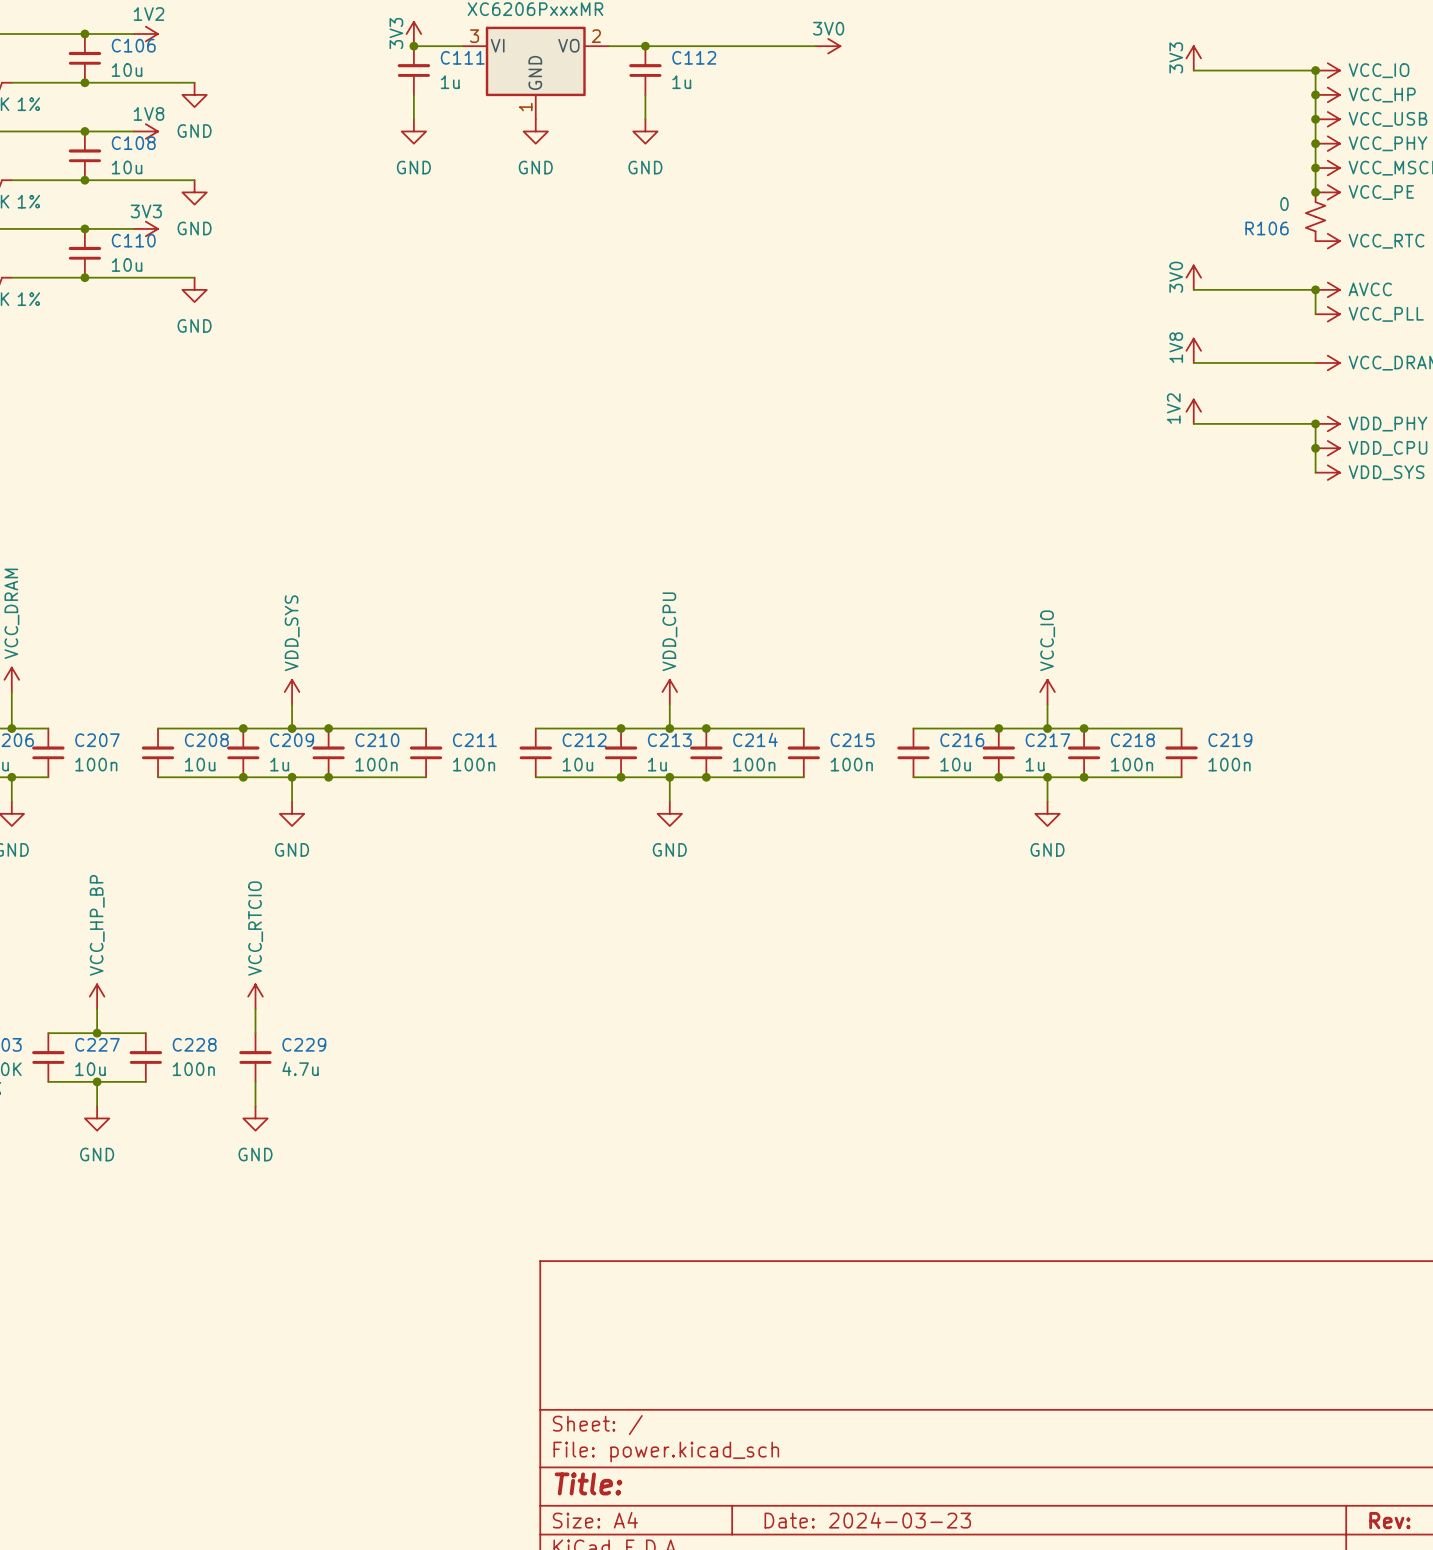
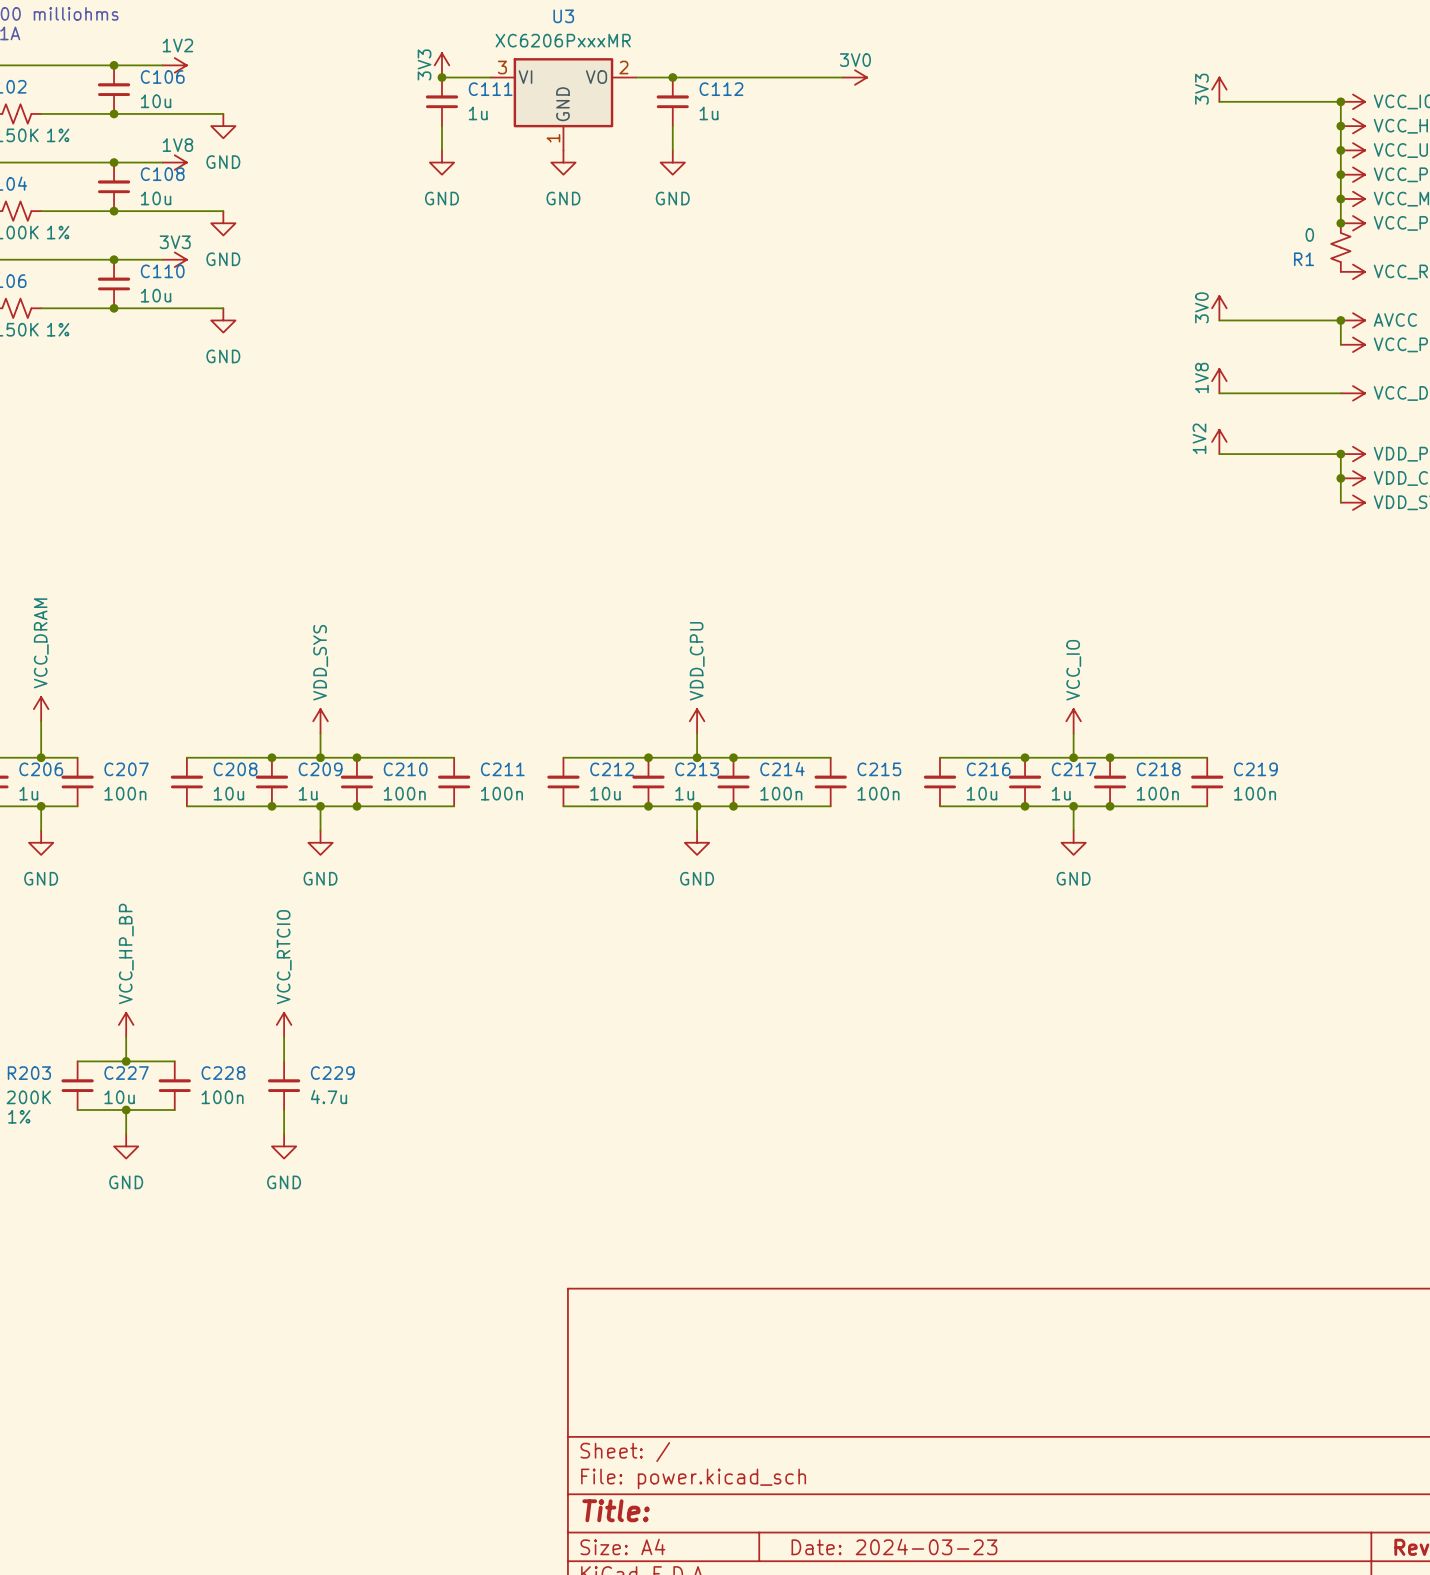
R106 name: R106 (1267, 228) -> R1 (1304, 259)

